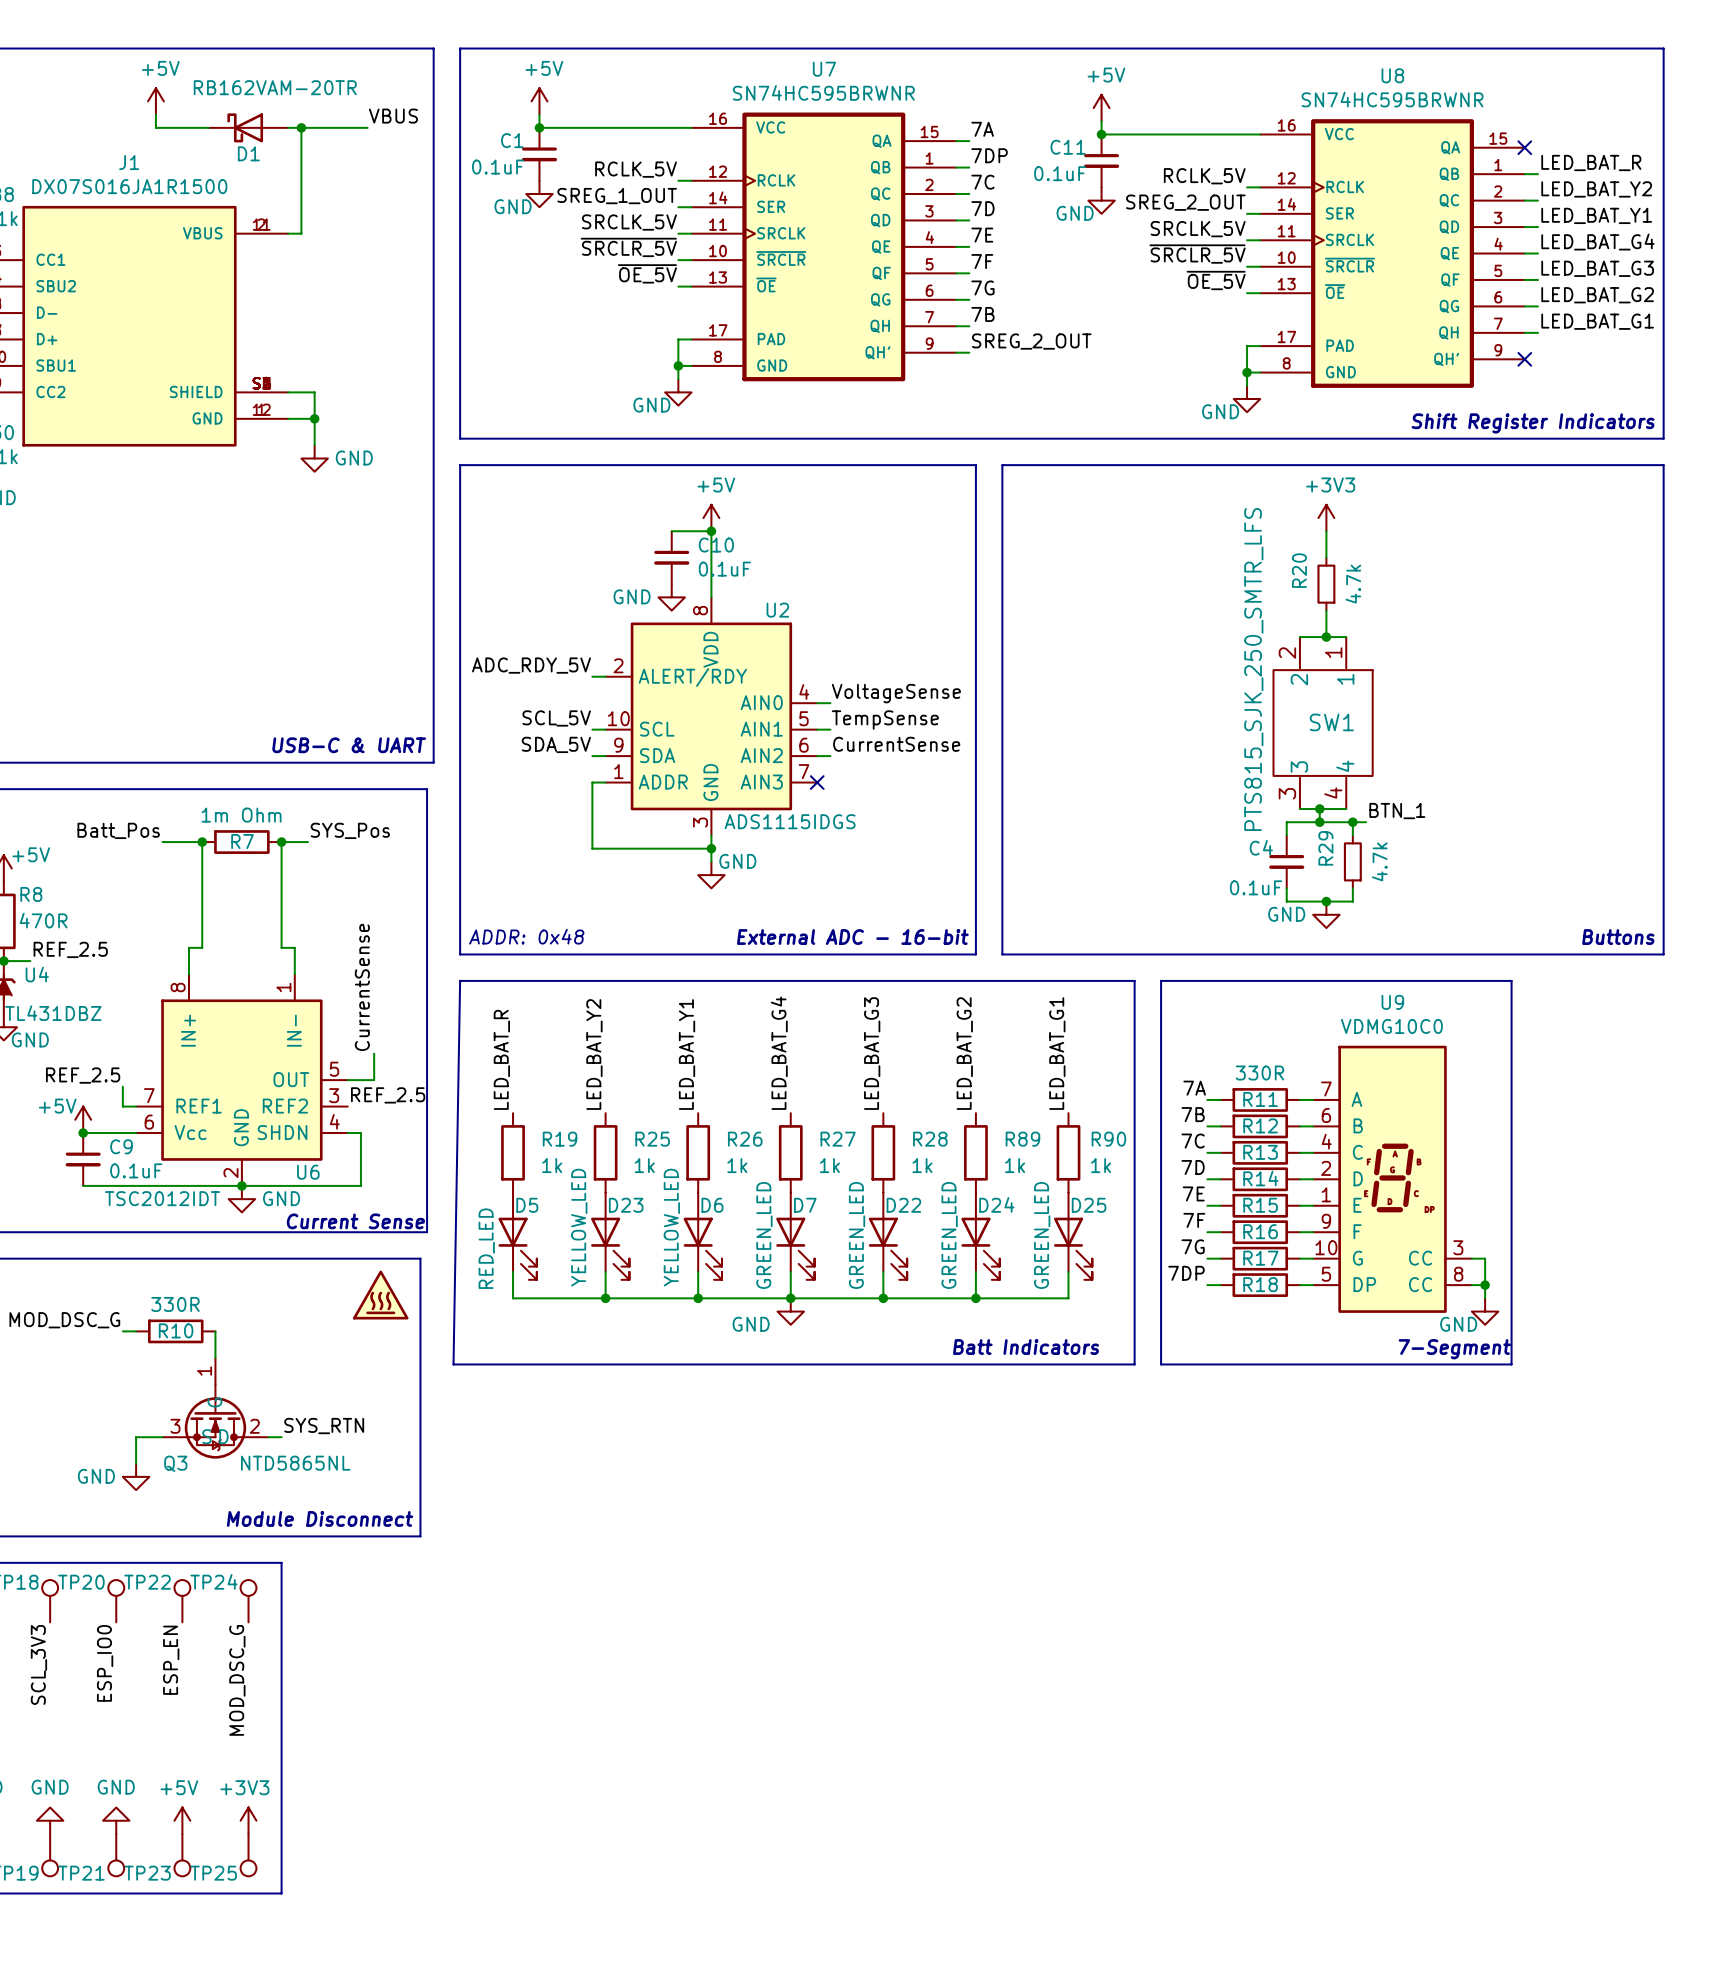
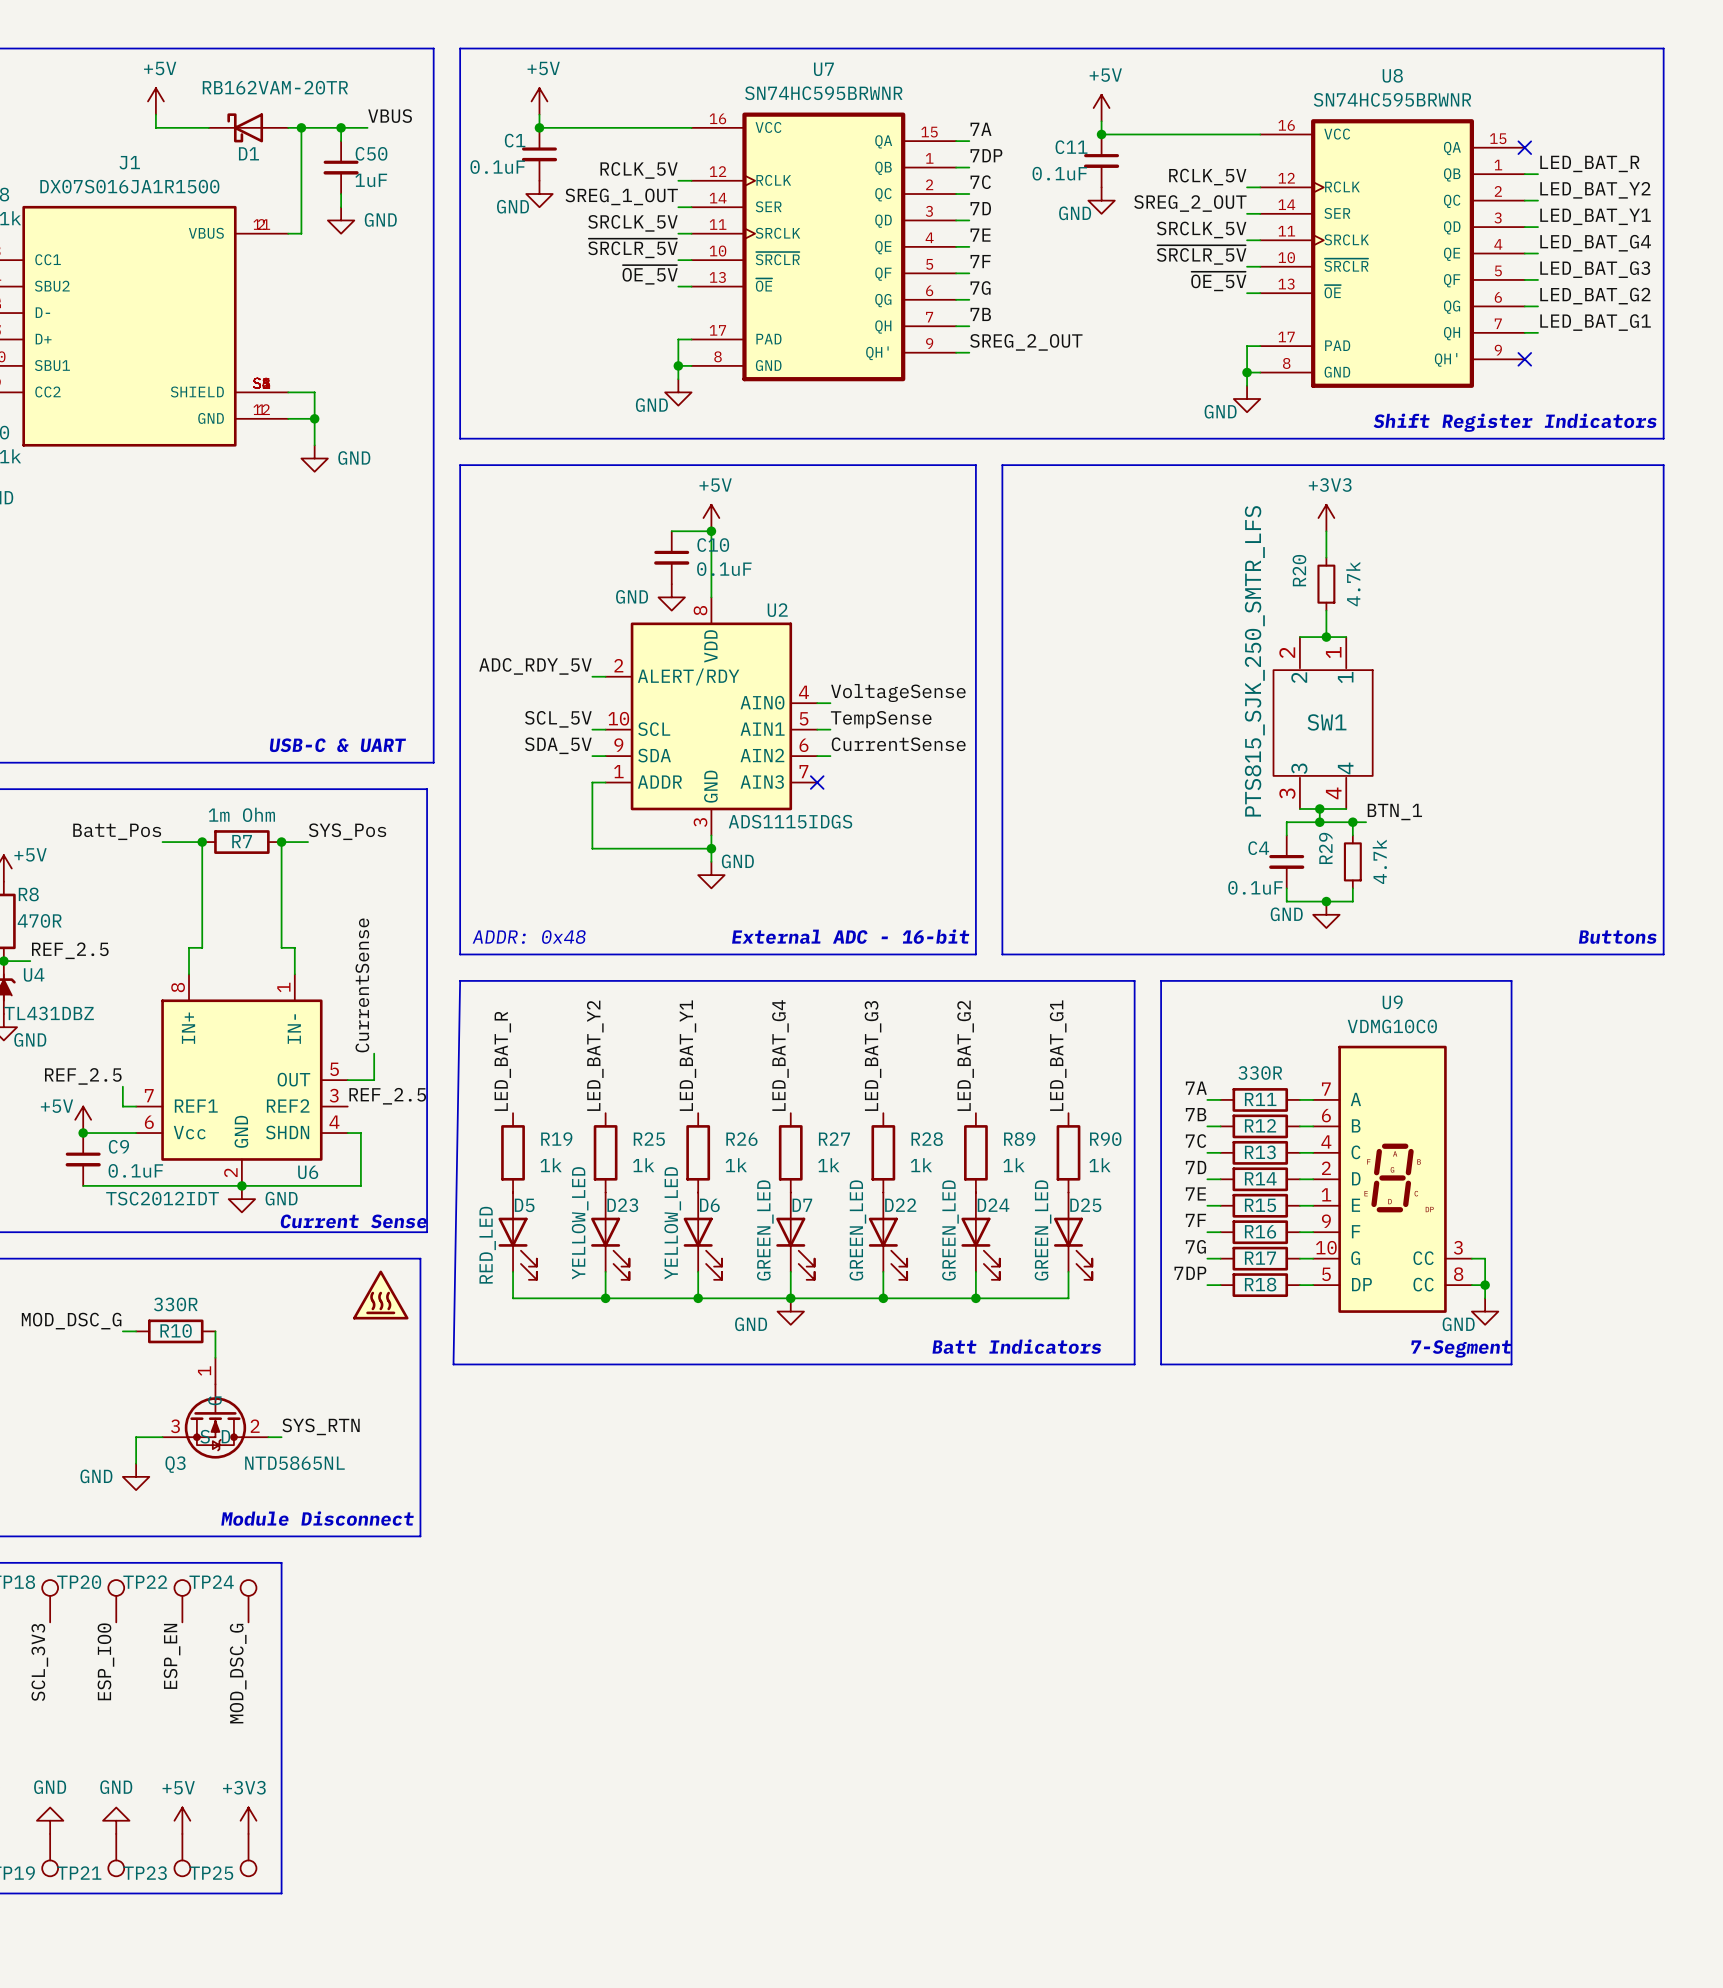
wire: none -> (341, 127) (341, 141)
junction: none -> (341, 127)
C50: none -> 1uF (341, 167)
wire: none -> (341, 194) (341, 207)
power symbol: none -> GND (341, 220)

